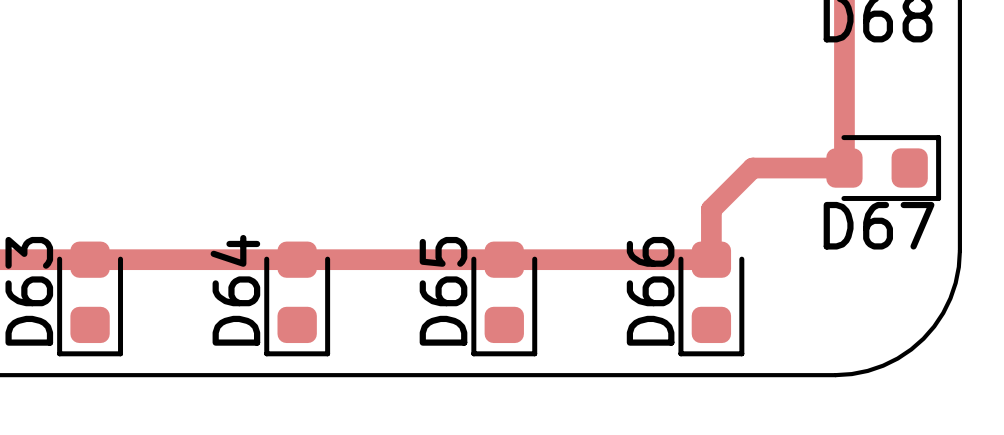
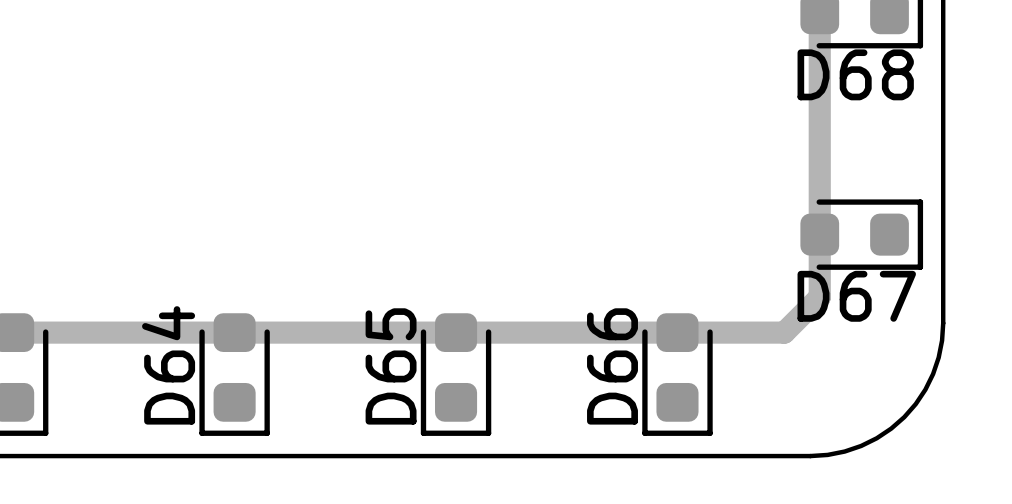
track: (844, 168) (752, 168) (711, 209) (711, 259) -> (819, 234) (819, 297) (784, 332) (677, 332)

